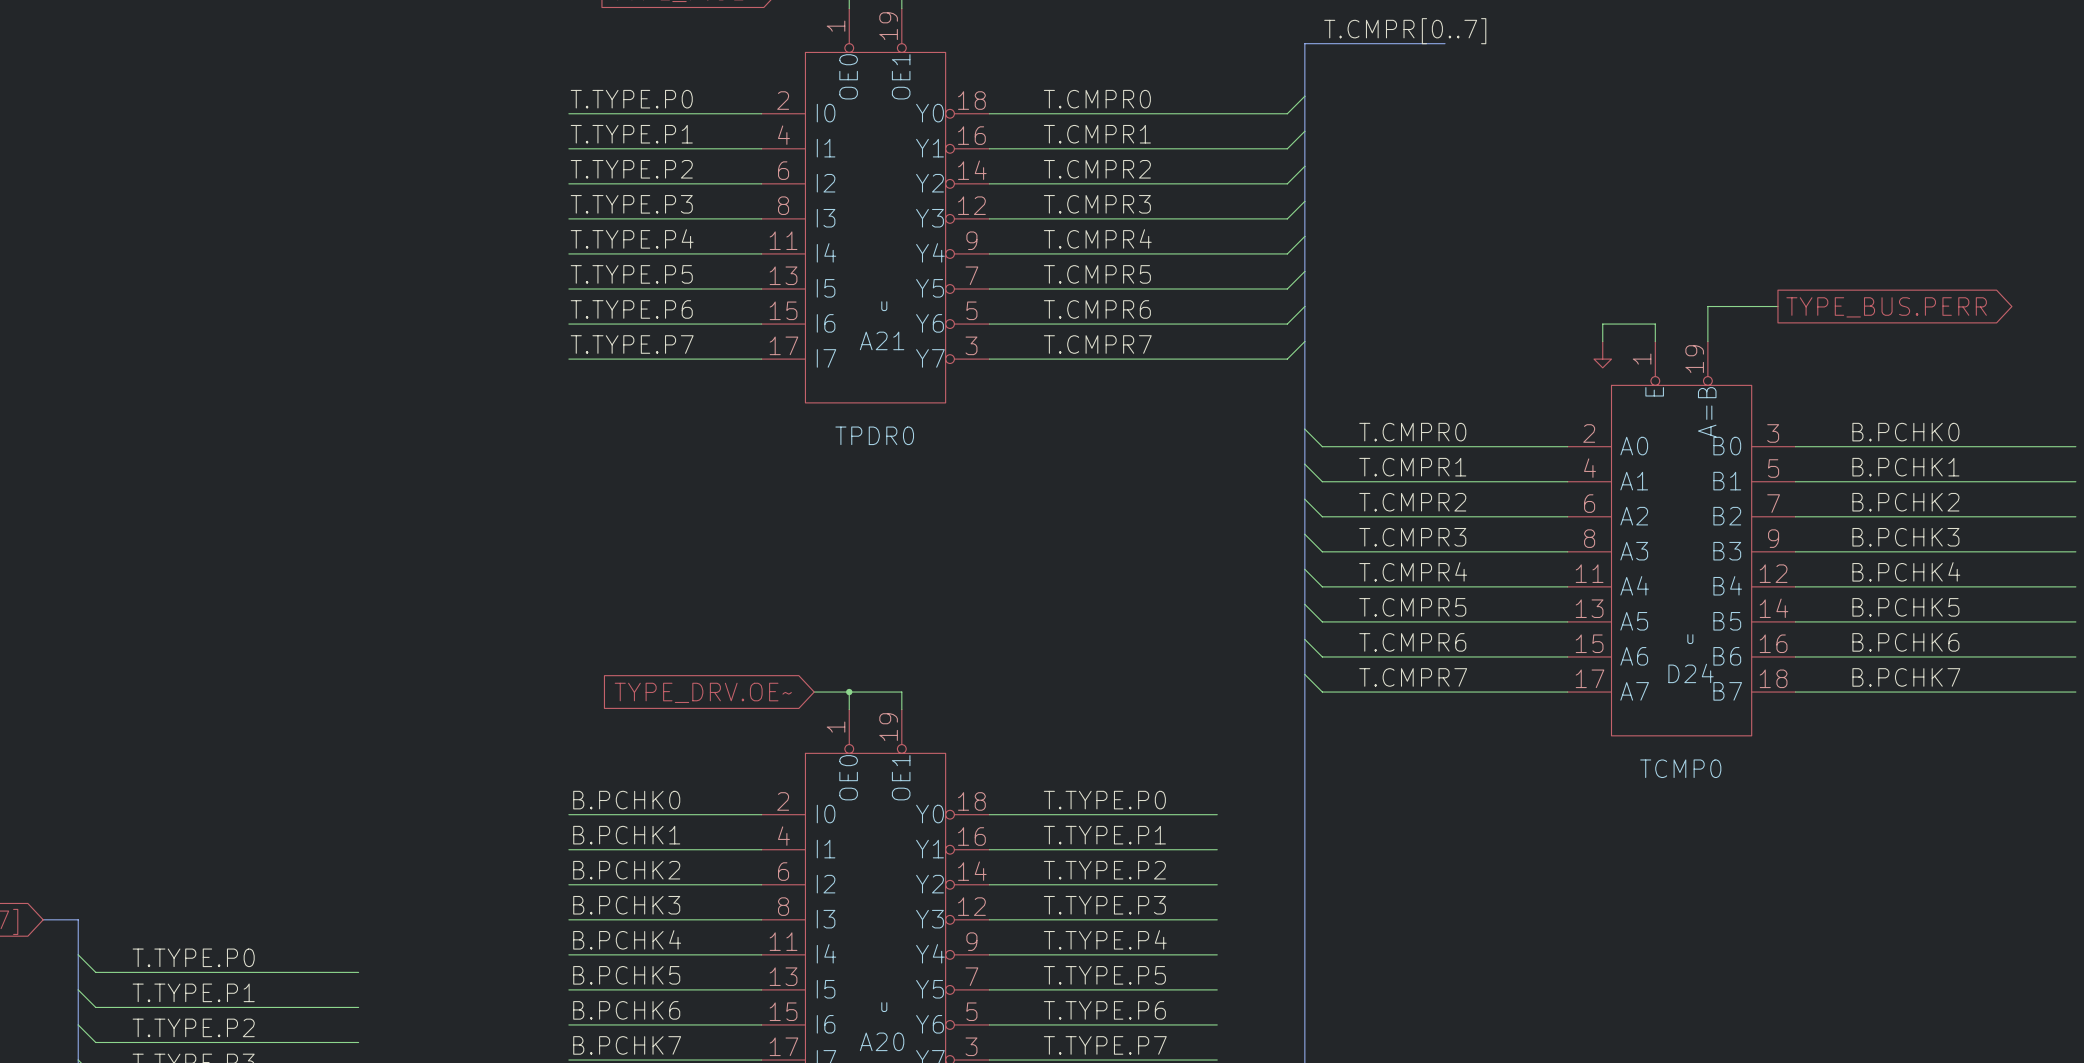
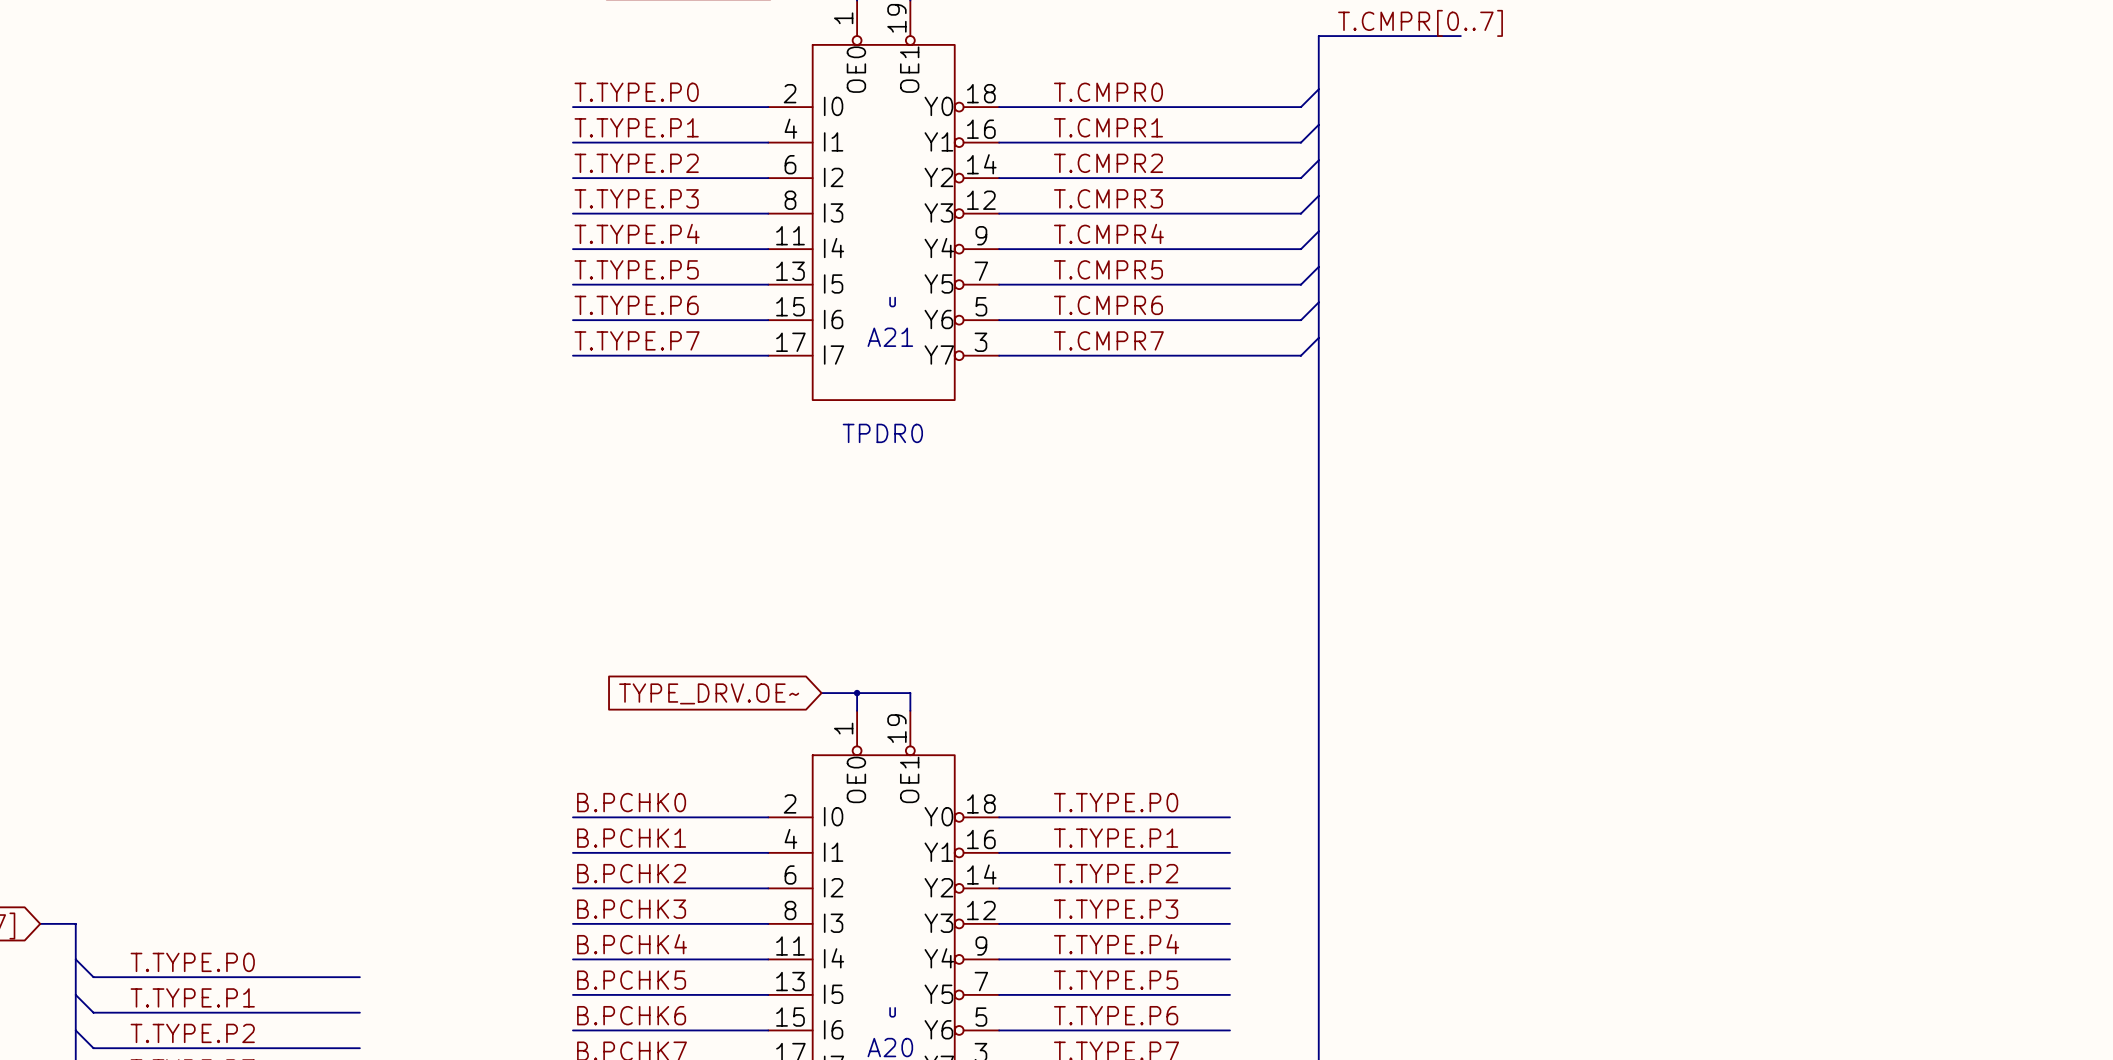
wire: (1777, 306) (1707, 306) (1707, 341) -> none
global label: TYPE_BUS.PERR (1886, 307) -> none
wire: (1602, 341) (1602, 324) (1655, 324) (1655, 341) -> none
power symbol: (1602, 354) -> none
wire: (1304, 429) (1322, 446) (1567, 446) -> none
label: T.CMPR0 (1412, 432) -> none
label: B.PCHK0 (1905, 432) -> none
wire: (1795, 446) (2075, 446) -> none
wire: (1304, 464) (1322, 481) (1567, 481) -> none
label: T.CMPR1 (1412, 467) -> none
label: B.PCHK1 (1905, 467) -> none
wire: (1795, 481) (2075, 481) -> none
wire: (1304, 499) (1322, 516) (1567, 516) -> none
label: T.CMPR2 (1412, 502) -> none
label: B.PCHK2 (1905, 502) -> none
wire: (1795, 516) (2075, 516) -> none
wire: (1304, 534) (1322, 551) (1567, 551) -> none
label: T.CMPR3 (1412, 537) -> none
label: B.PCHK3 (1905, 537) -> none
U: (1681, 538) -> none
wire: (1795, 551) (2075, 551) -> none
wire: (1304, 569) (1322, 586) (1567, 586) -> none
label: T.CMPR4 (1413, 571) -> none
label: B.PCHK4 (1906, 571) -> none
wire: (1795, 586) (2075, 586) -> none
wire: (1304, 604) (1322, 621) (1567, 621) -> none
label: T.CMPR5 (1412, 607) -> none
label: B.PCHK5 (1905, 607) -> none
wire: (1795, 621) (2075, 621) -> none
wire: (1304, 639) (1322, 656) (1567, 656) -> none
label: T.CMPR6 (1412, 642) -> none
label: B.PCHK6 (1905, 642) -> none
wire: (1795, 656) (2075, 656) -> none
wire: (1304, 674) (1322, 692) (1567, 692) -> none
label: T.CMPR7 (1413, 677) -> none
label: B.PCHK7 (1906, 677) -> none
wire: (1795, 692) (2075, 692) -> none

